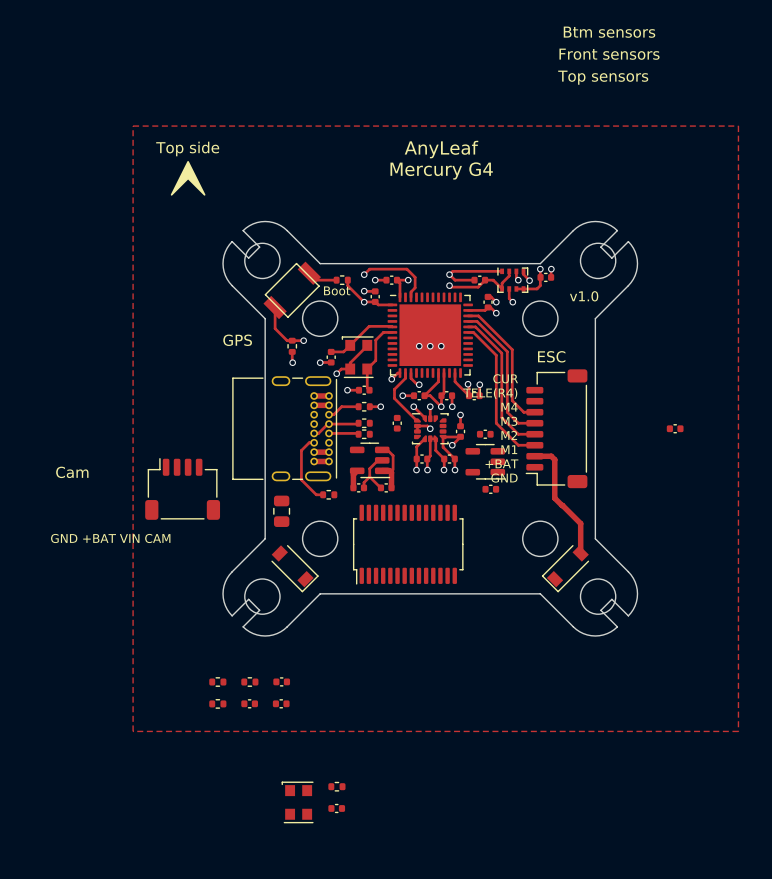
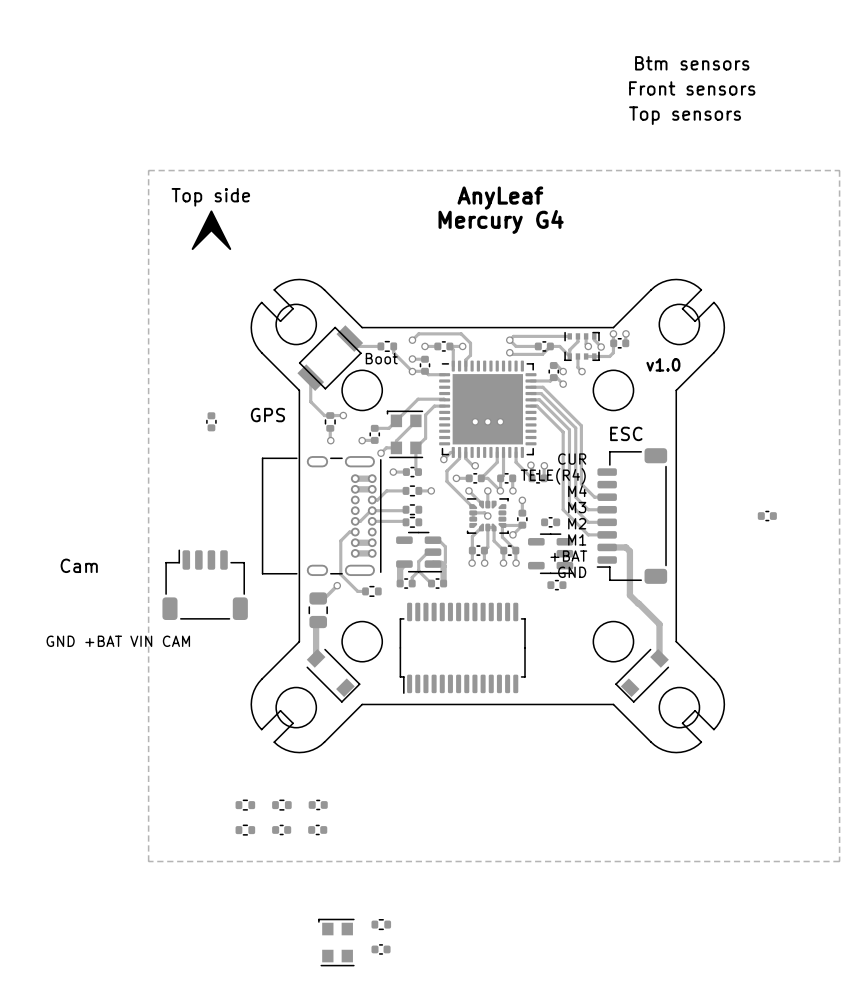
part position: (397, 423) -> (211, 421)
track: none -> (337, 585) (324, 598) (318, 598)
via: none -> (337, 585)
track: none -> (318, 622) (316, 624) (316, 658)

